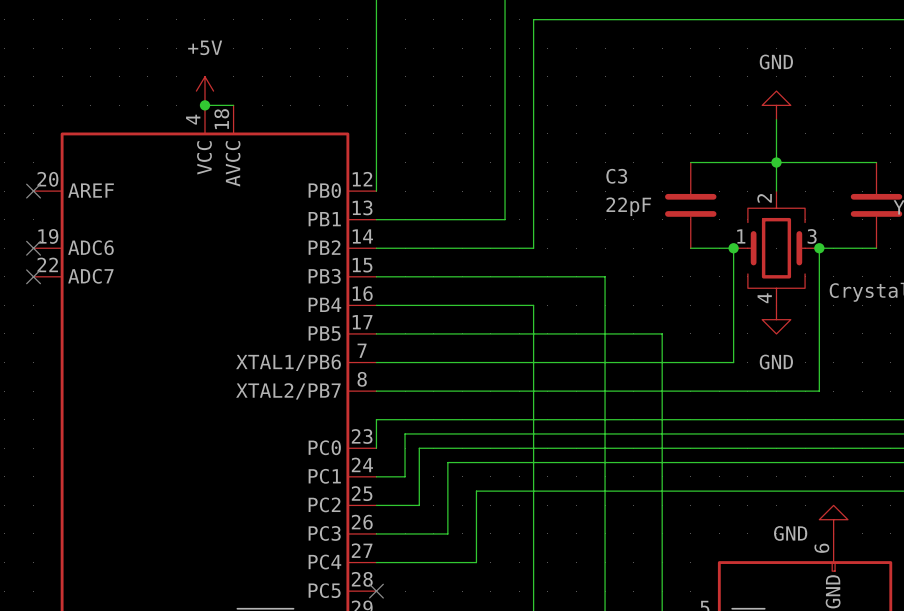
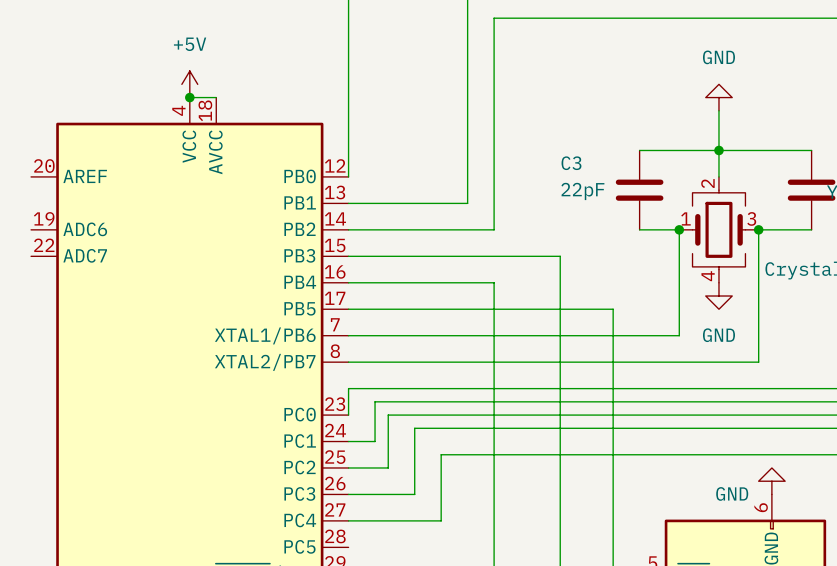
no-connect mark: (33, 191) -> none
no-connect mark: (33, 248) -> none
no-connect mark: (33, 276) -> none
no-connect mark: (376, 591) -> none

